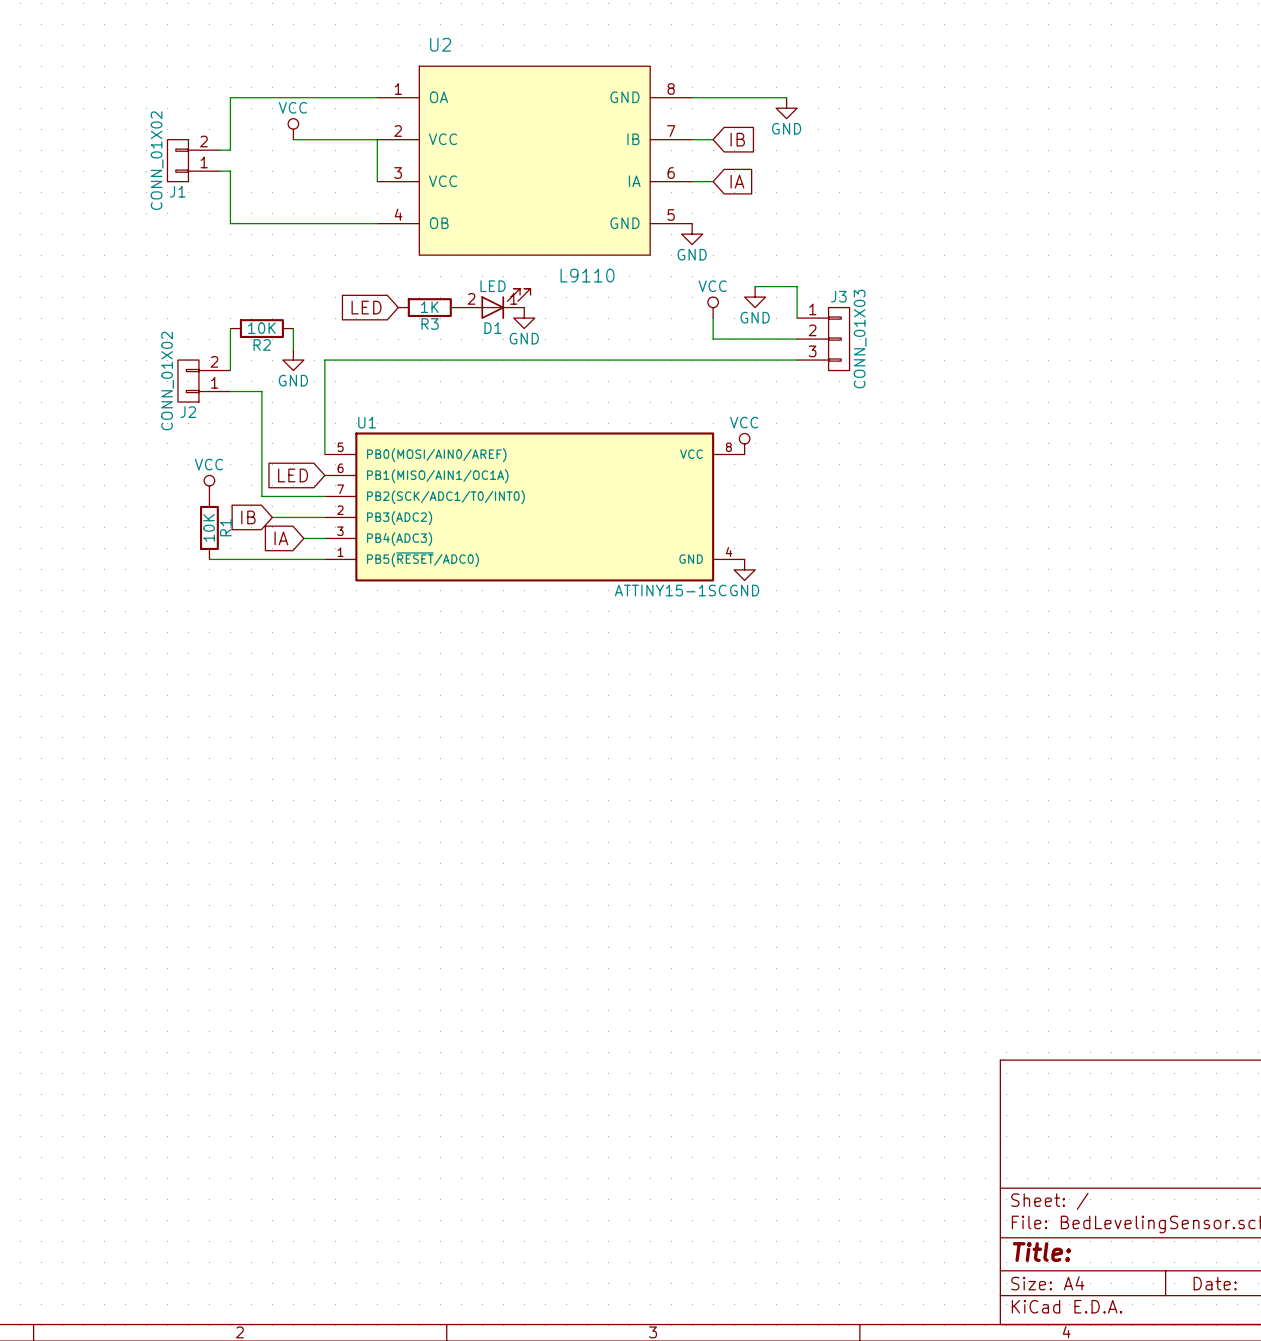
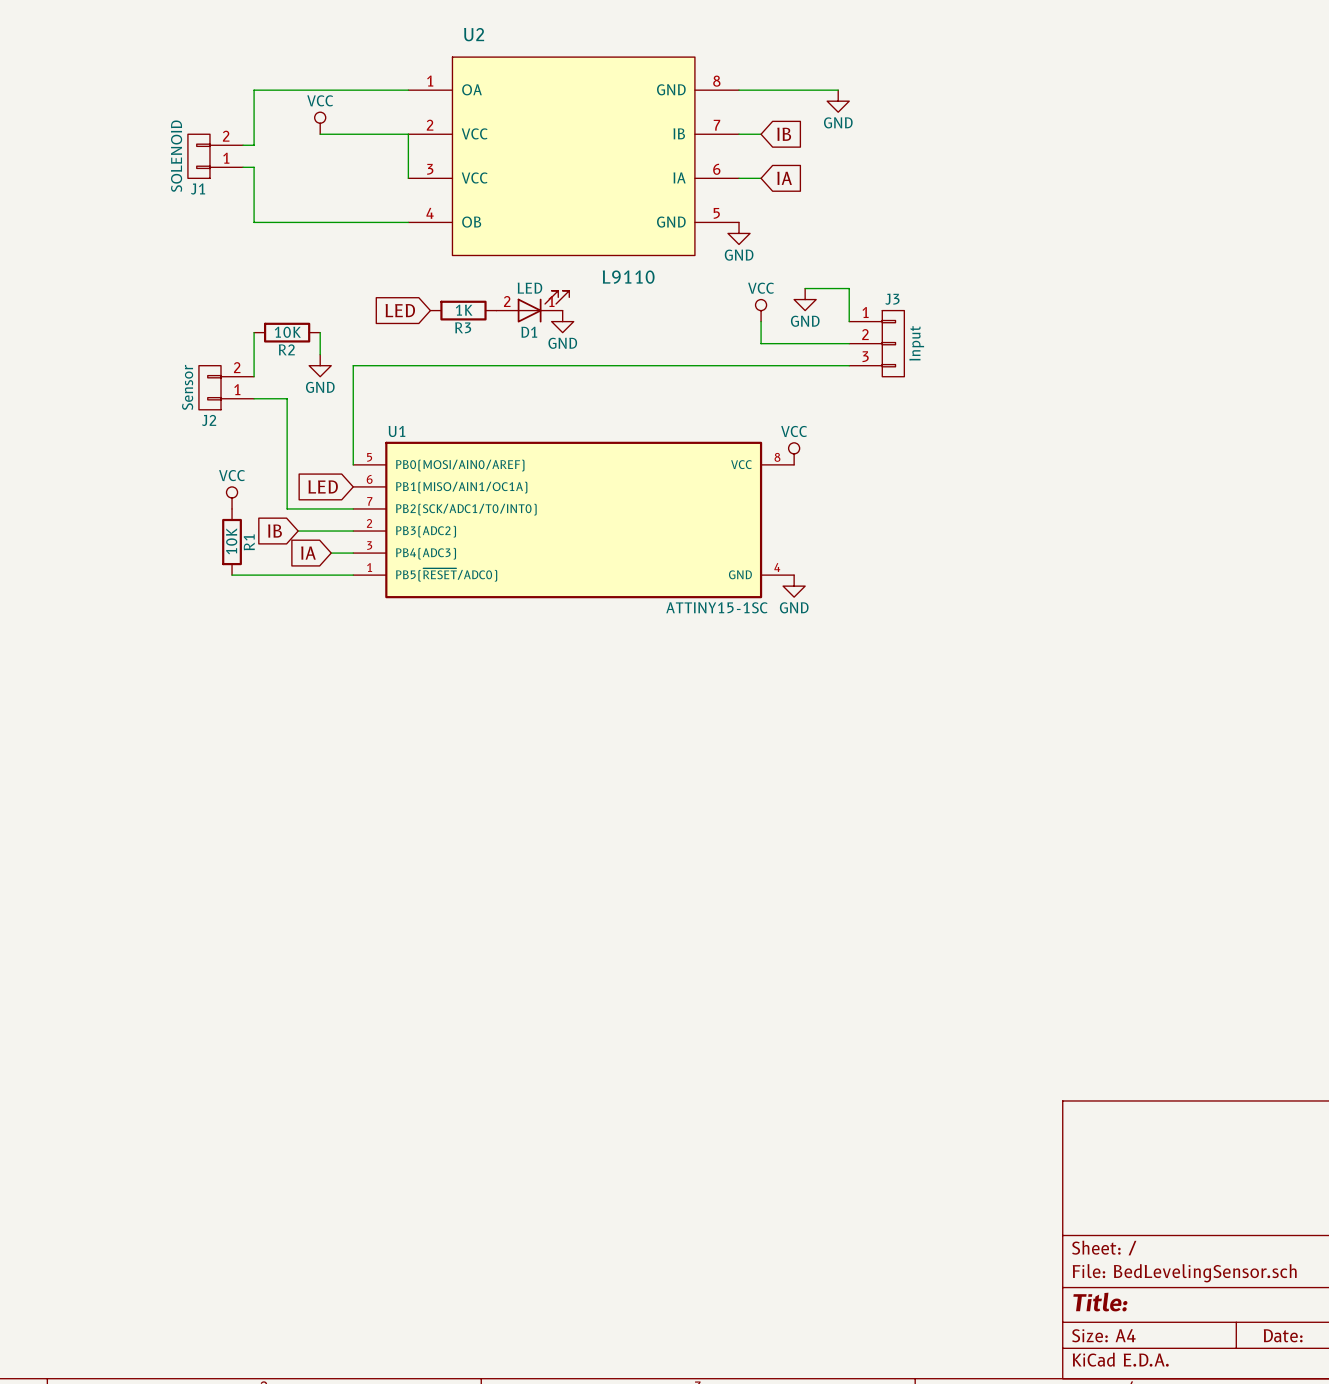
J1 value: CONN_01X02 (157, 160) -> SOLENOID (176, 156)
J3 value: CONN_01X03 (860, 339) -> Input (916, 343)
J2 value: CONN_01X02 (167, 381) -> Sensor (187, 387)

